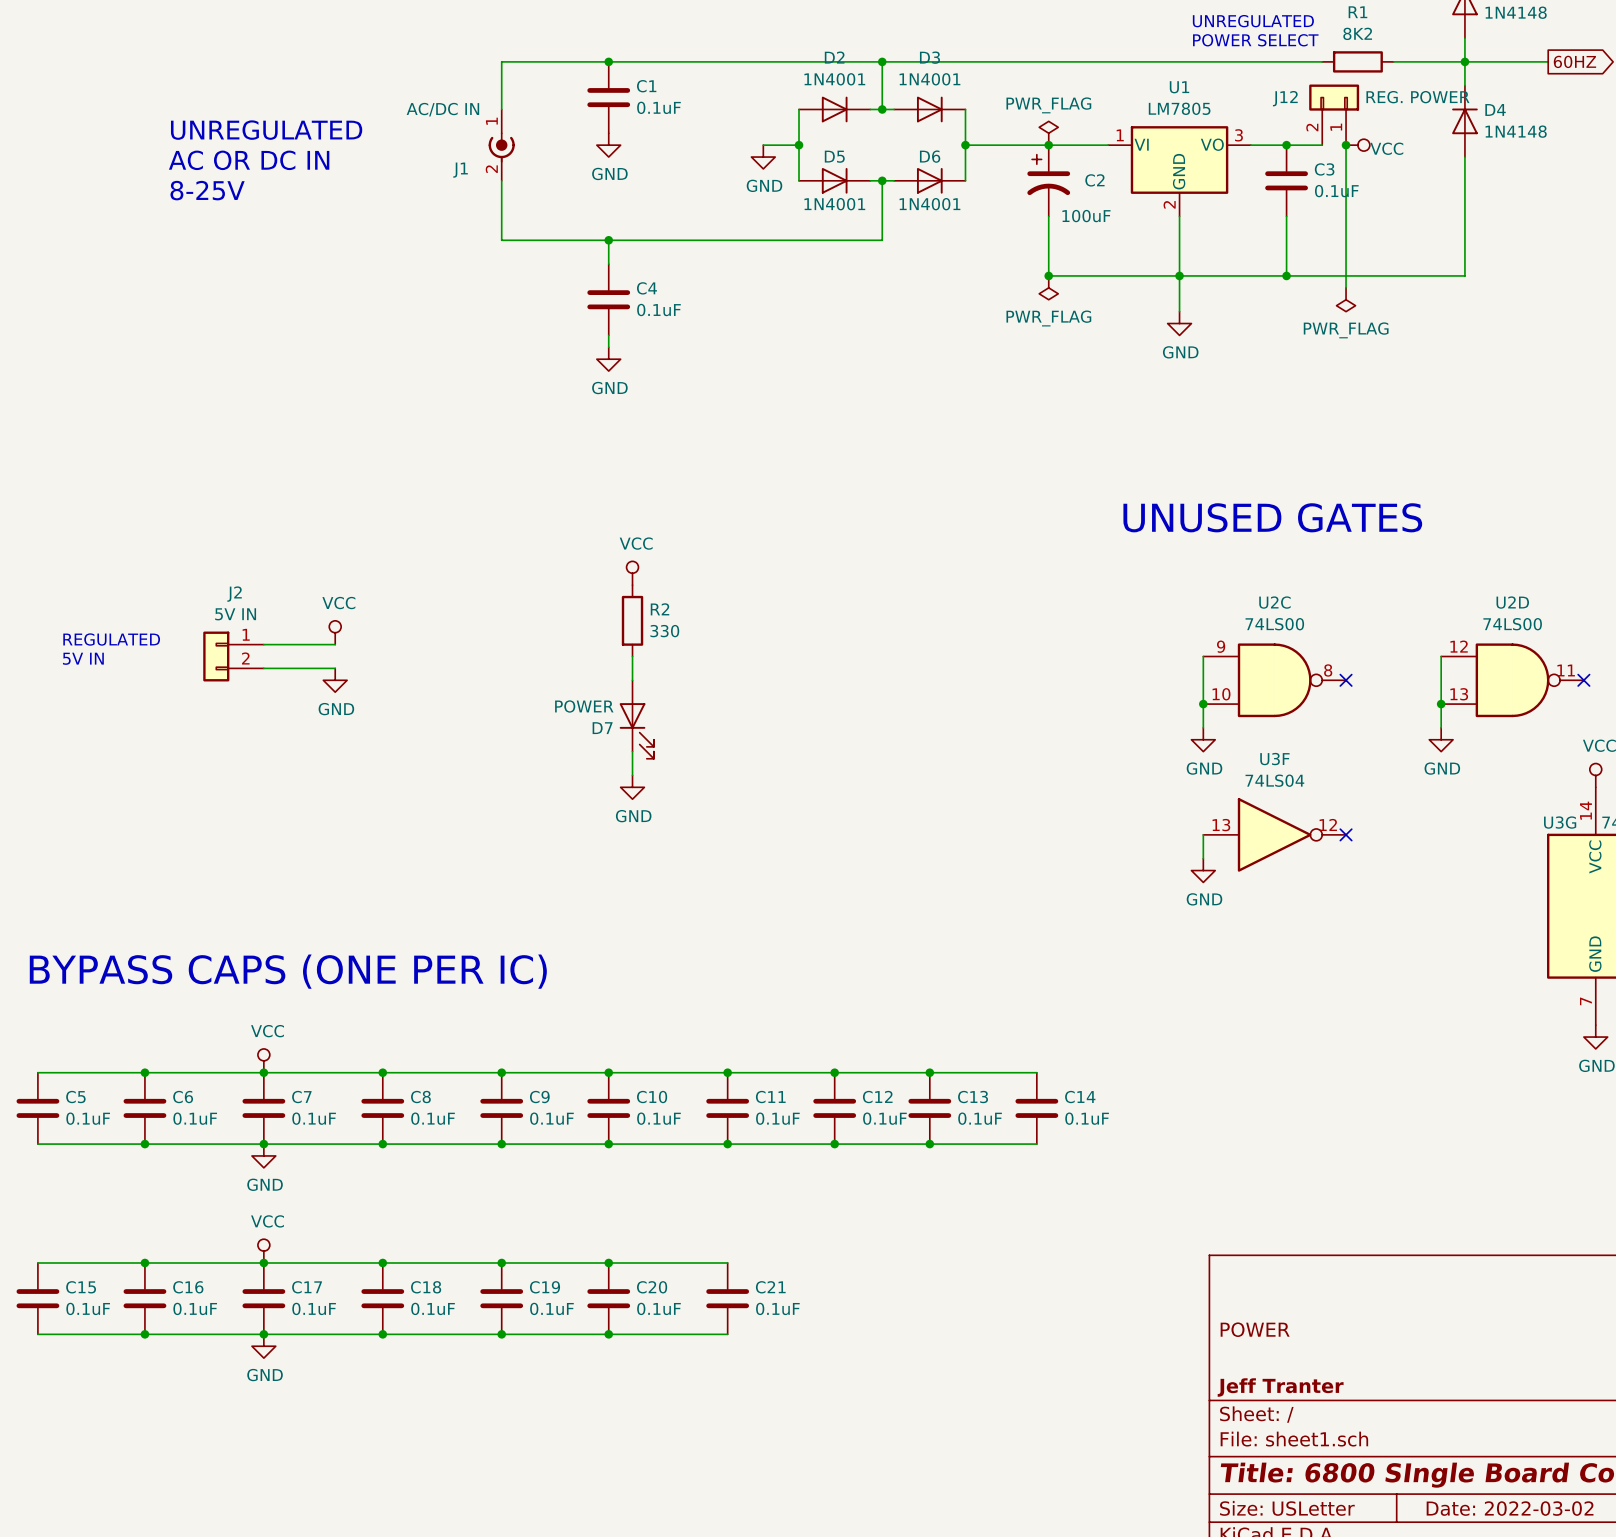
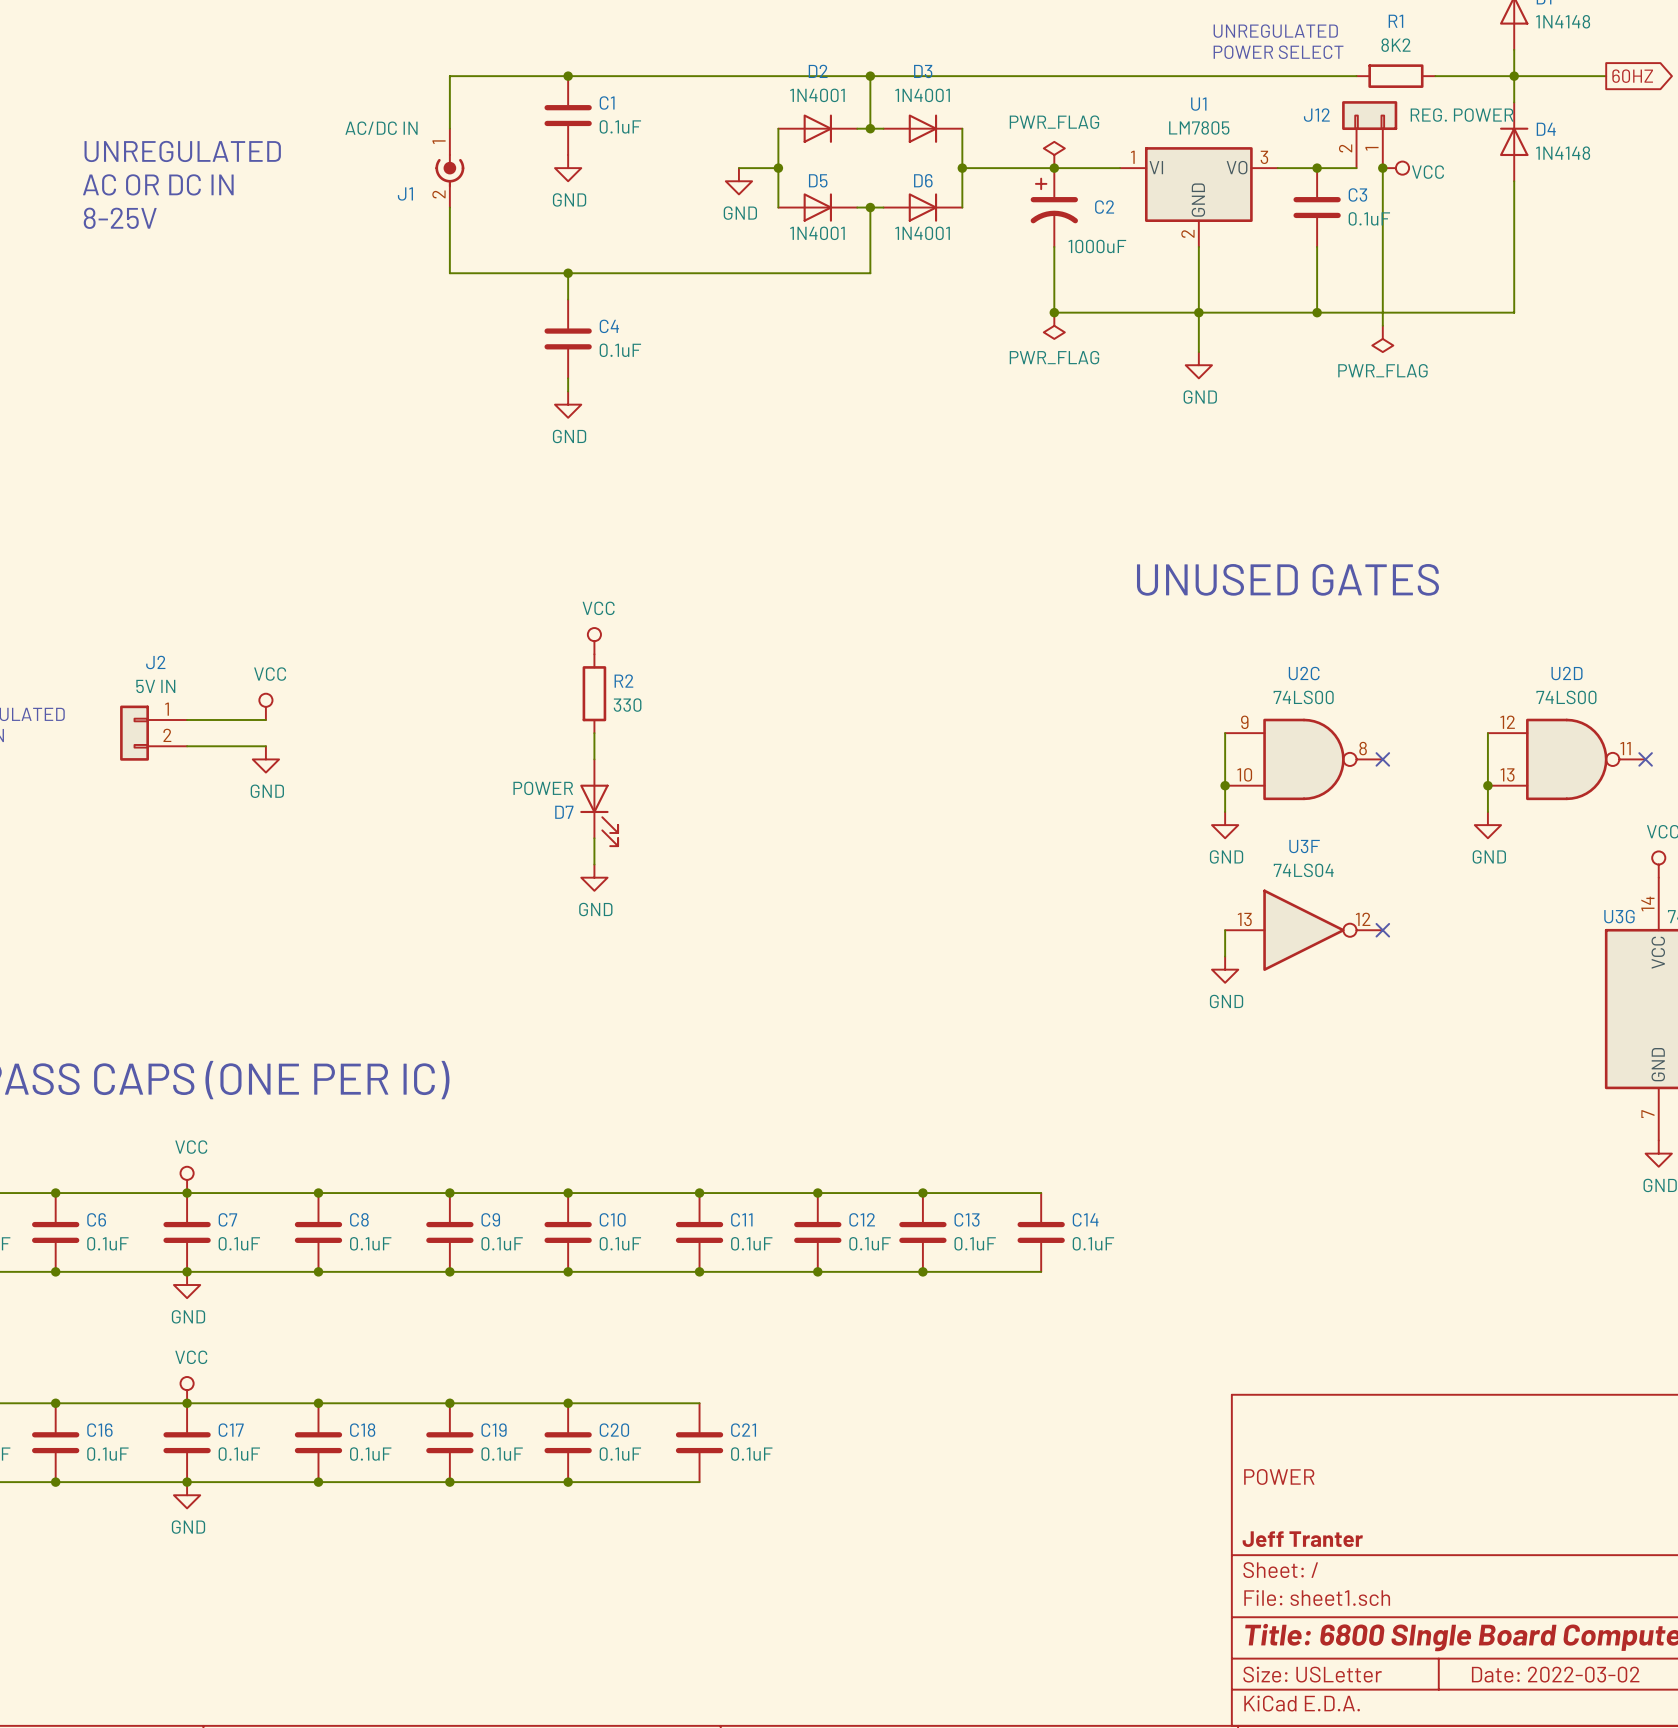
C2 value: 100uF (1086, 216) -> 1000uF (1097, 246)

